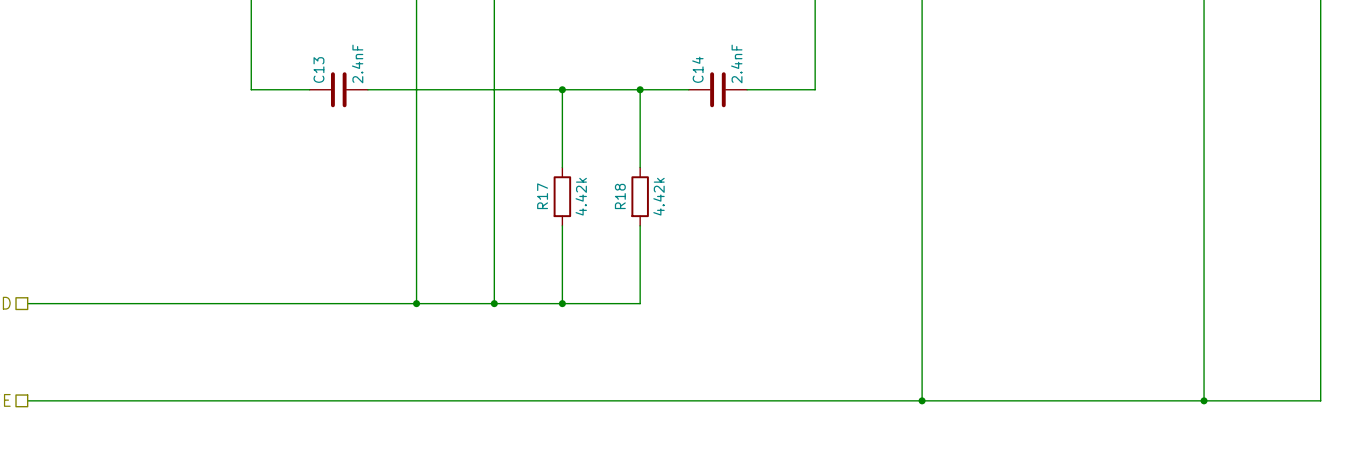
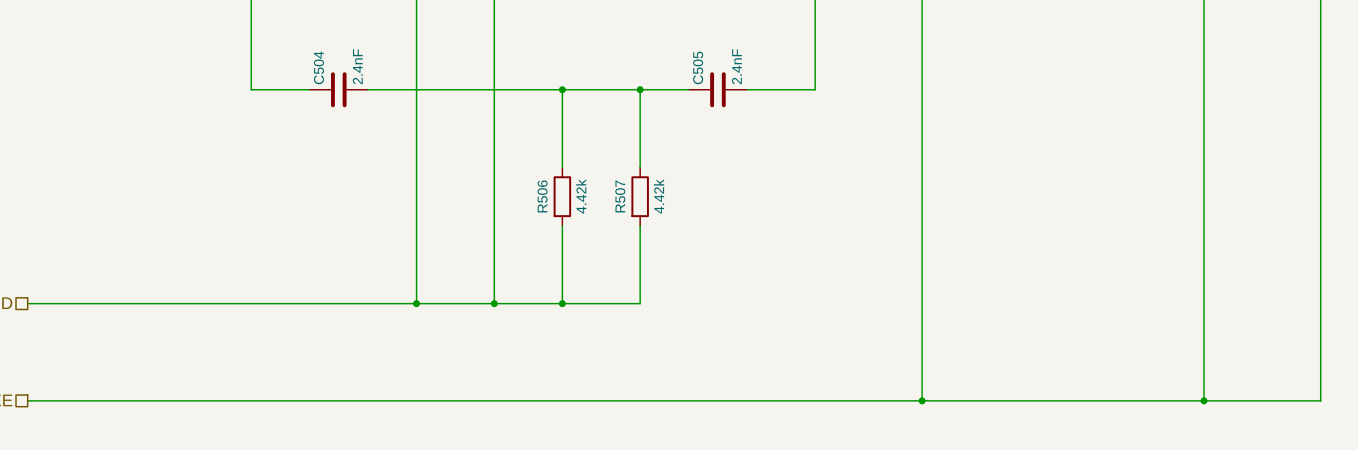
C14 name: C14 (697, 69) -> C505 (698, 67)
C13 name: C13 (318, 70) -> C504 (318, 67)
R17 name: R17 (542, 196) -> R506 (542, 196)
R18 name: R18 (620, 196) -> R507 (620, 196)

